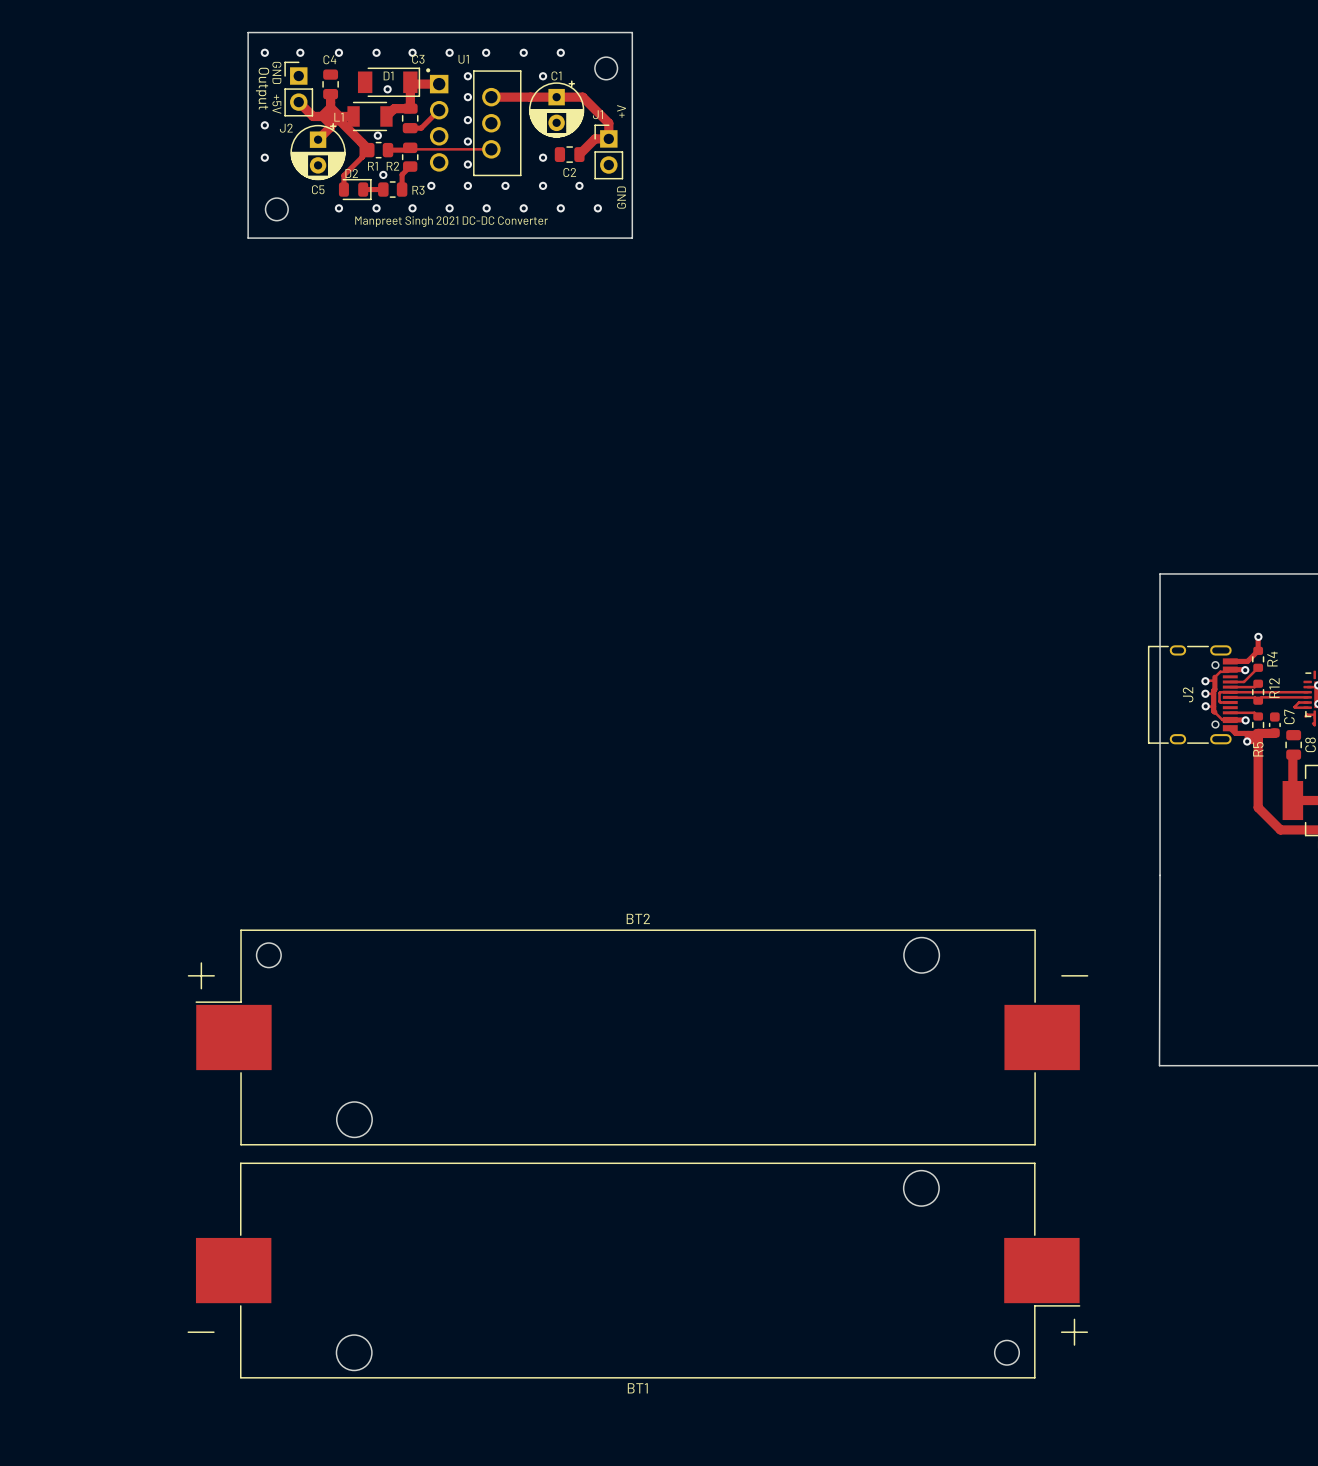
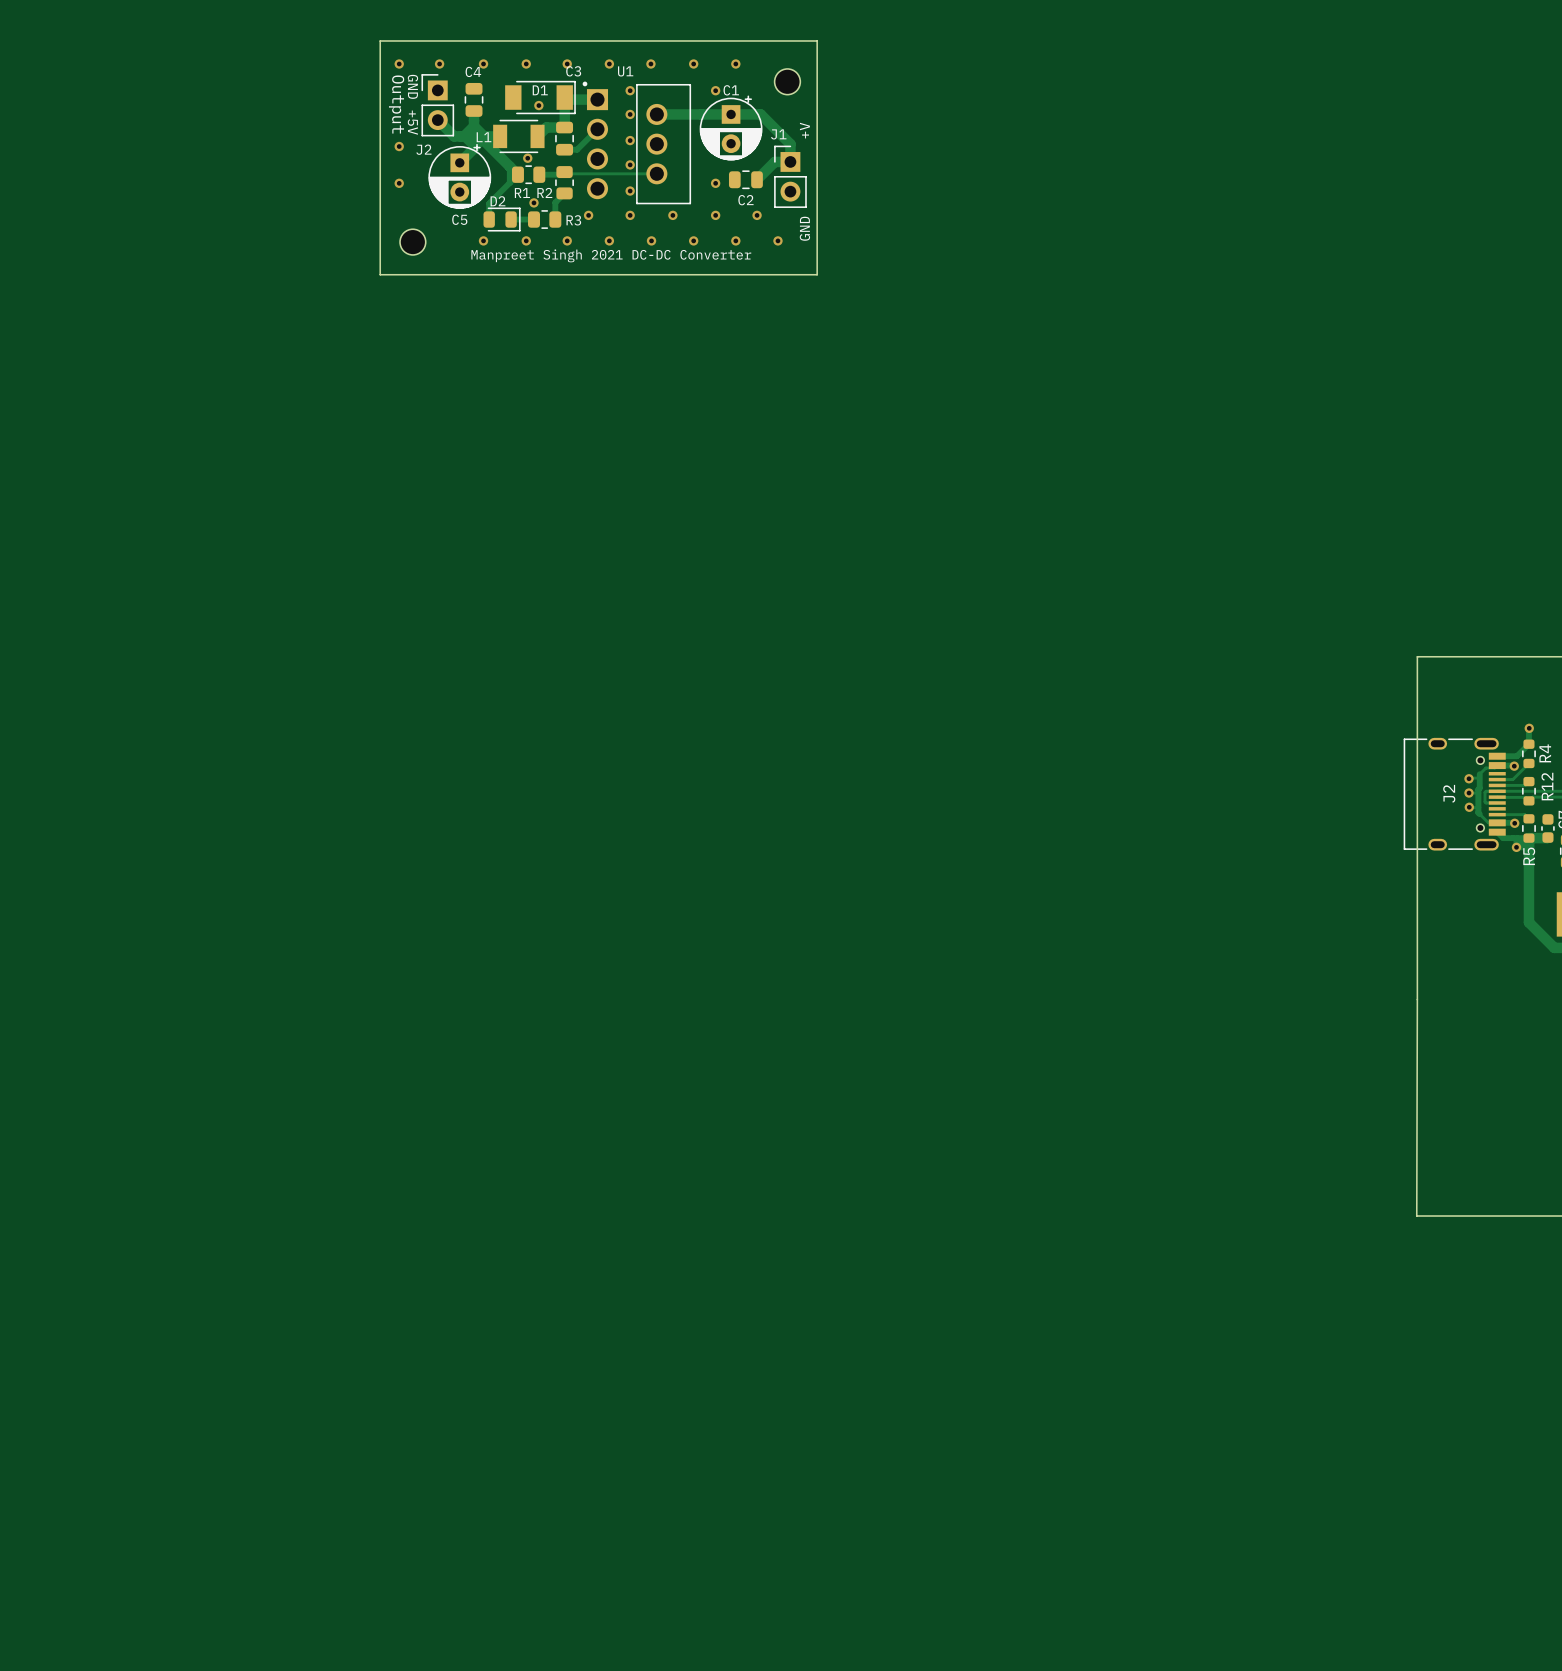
BT2: (638, 1037) -> none
BT1: (637, 1270) -> none

